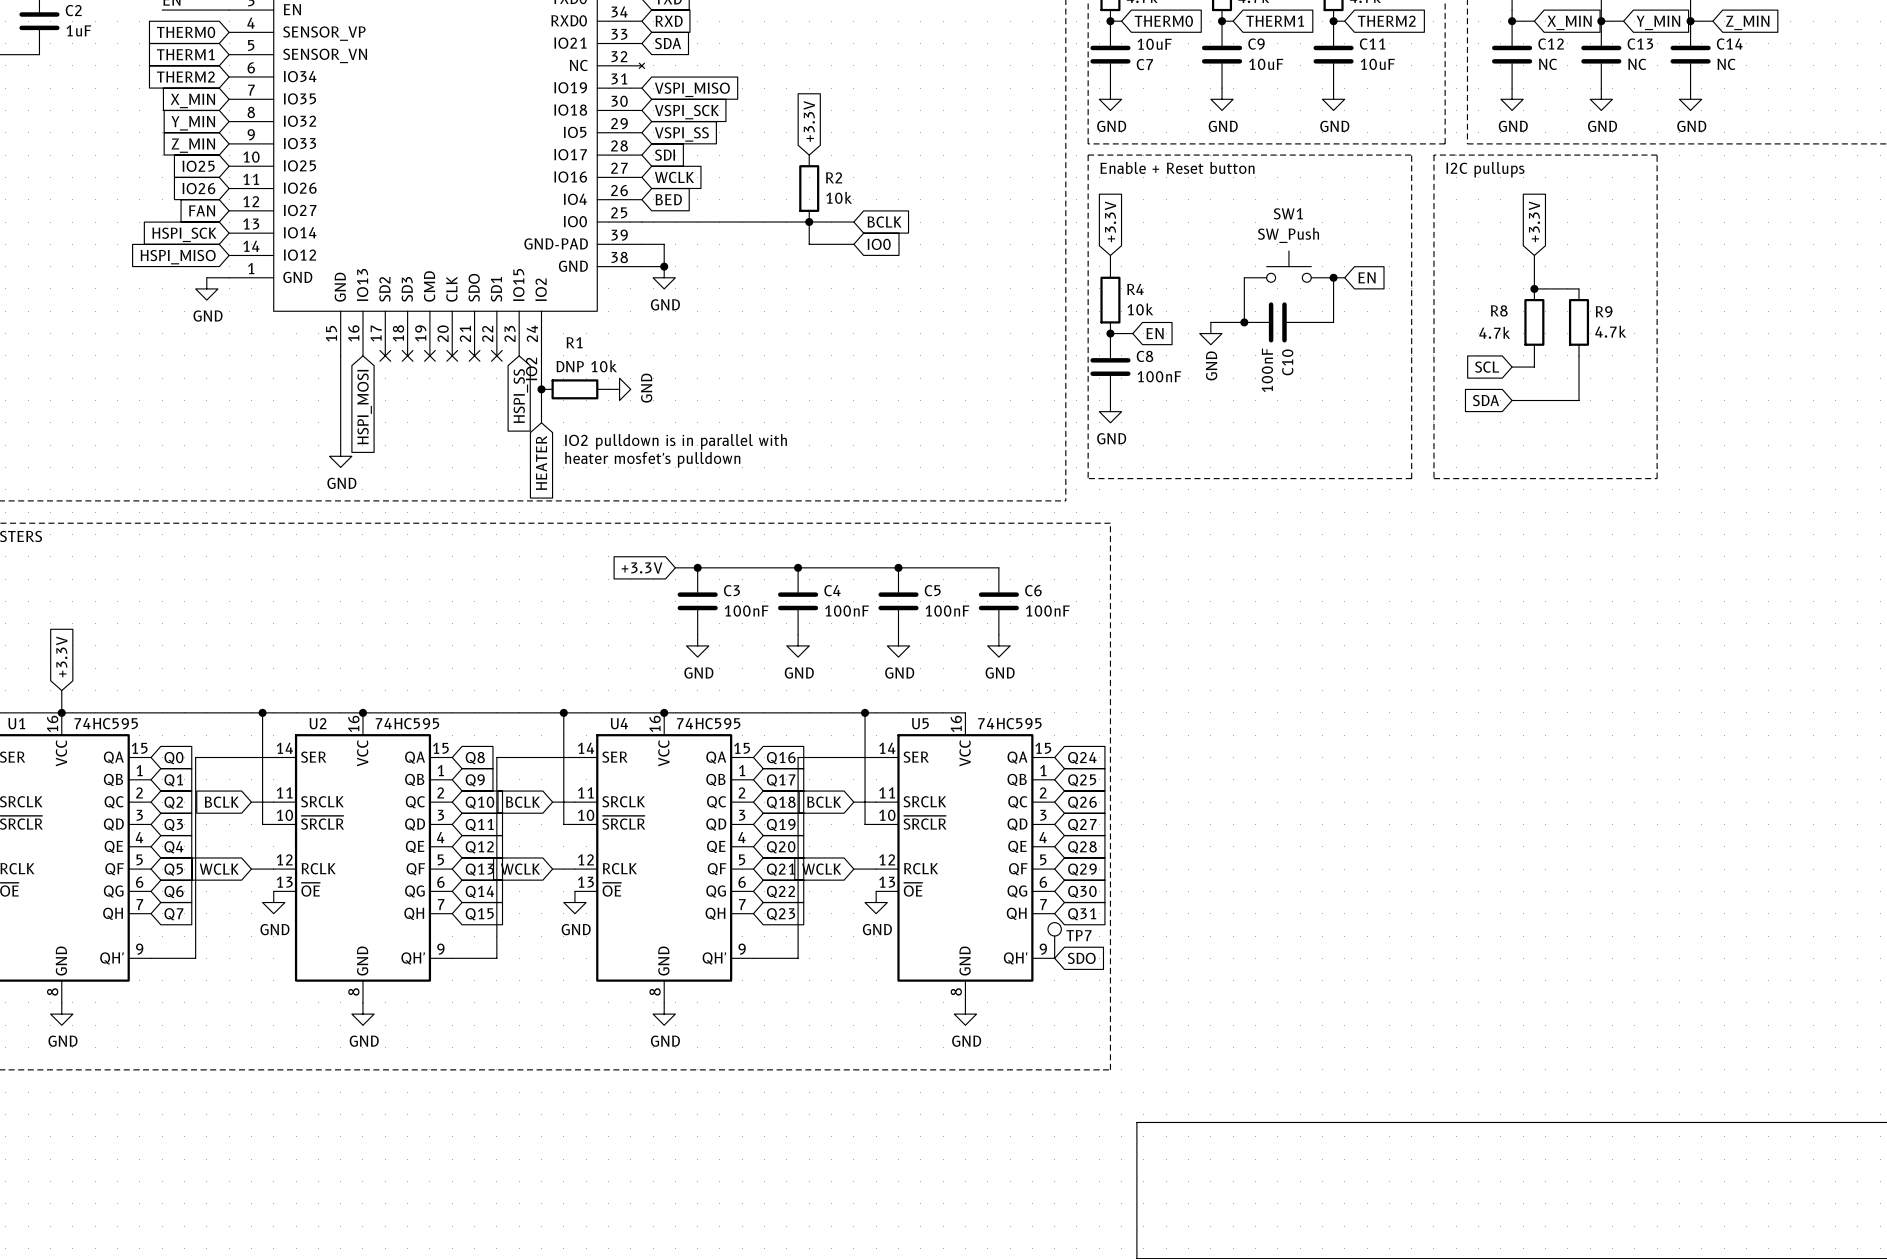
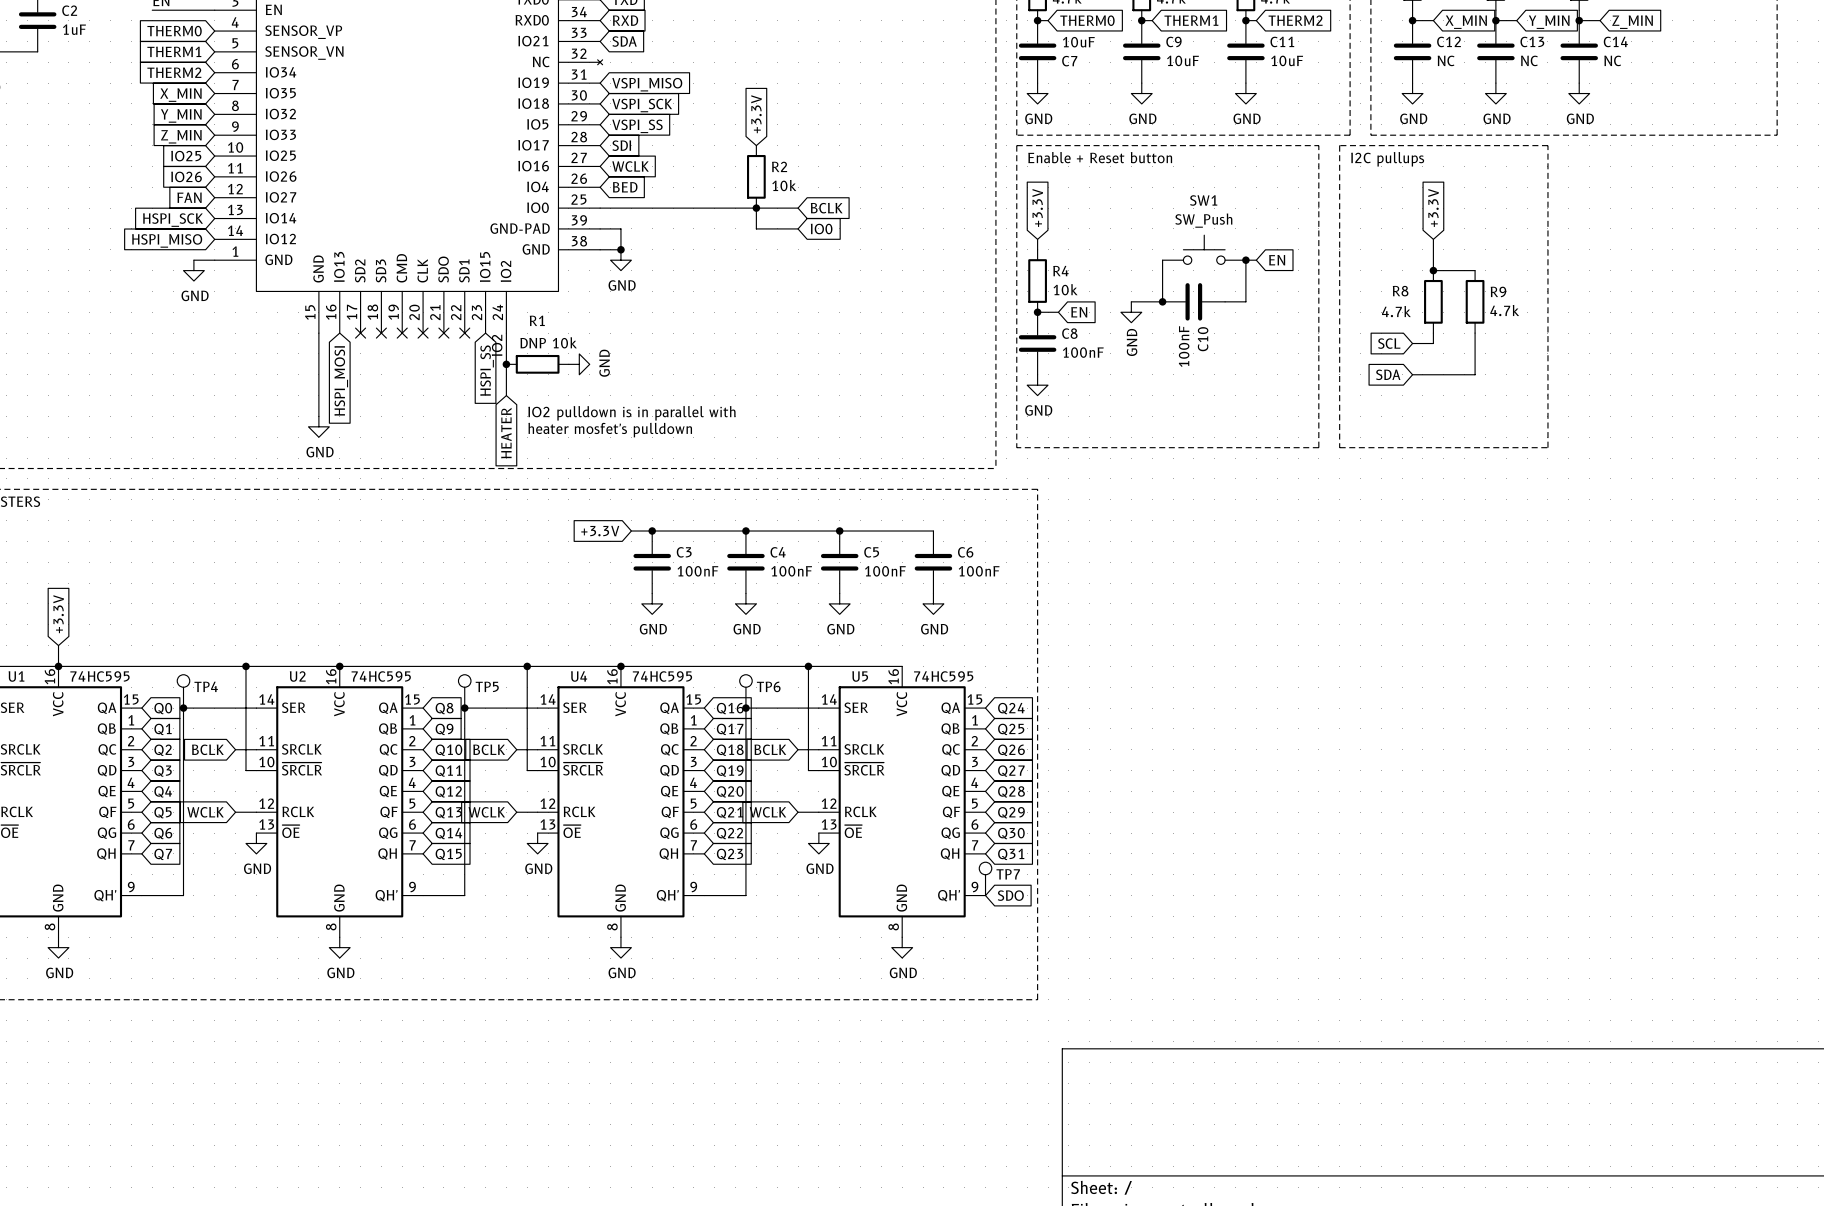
TP4: none -> (183, 691)
TP5: none -> (464, 691)
TP6: none -> (745, 691)
junction: none -> (183, 708)
junction: none -> (464, 708)
junction: none -> (745, 708)

